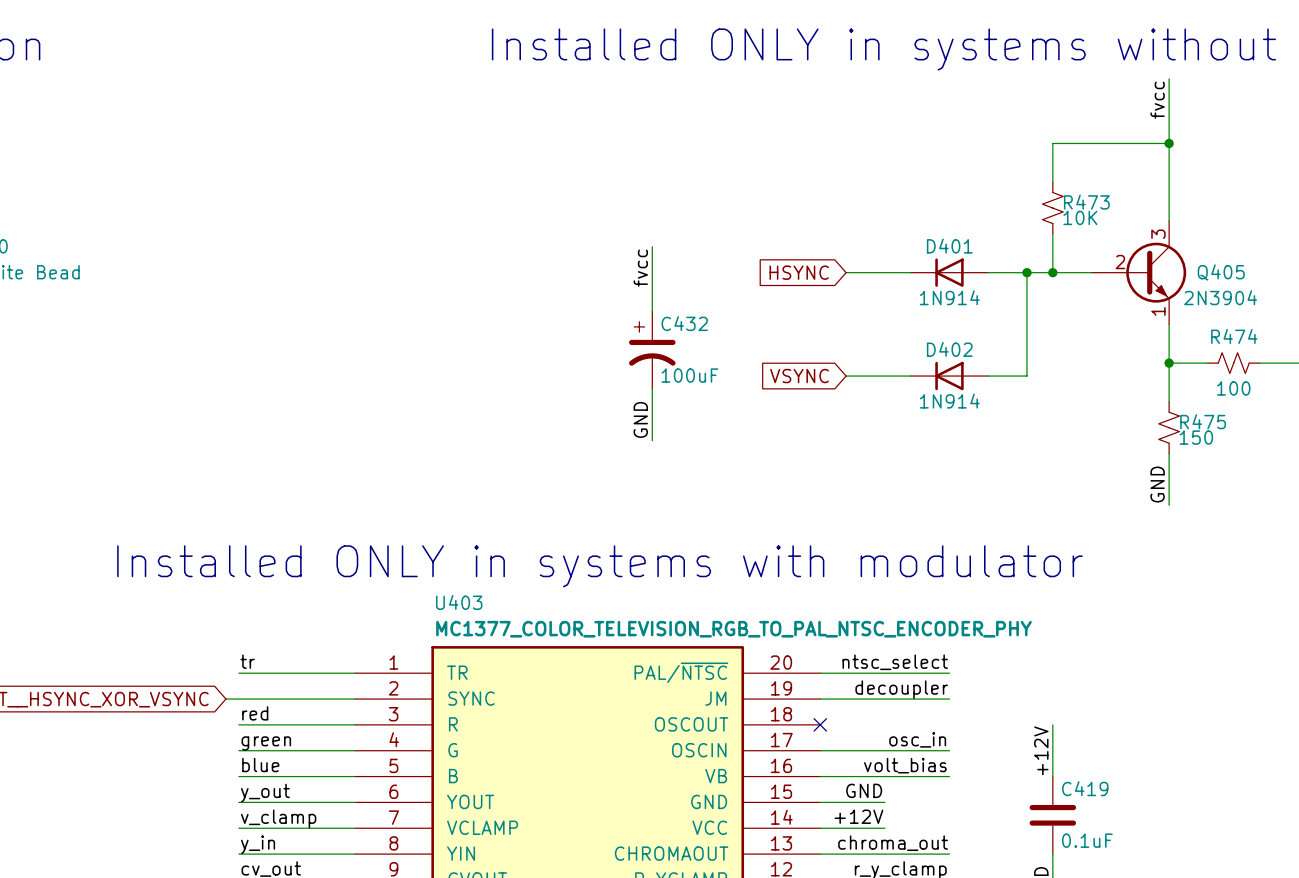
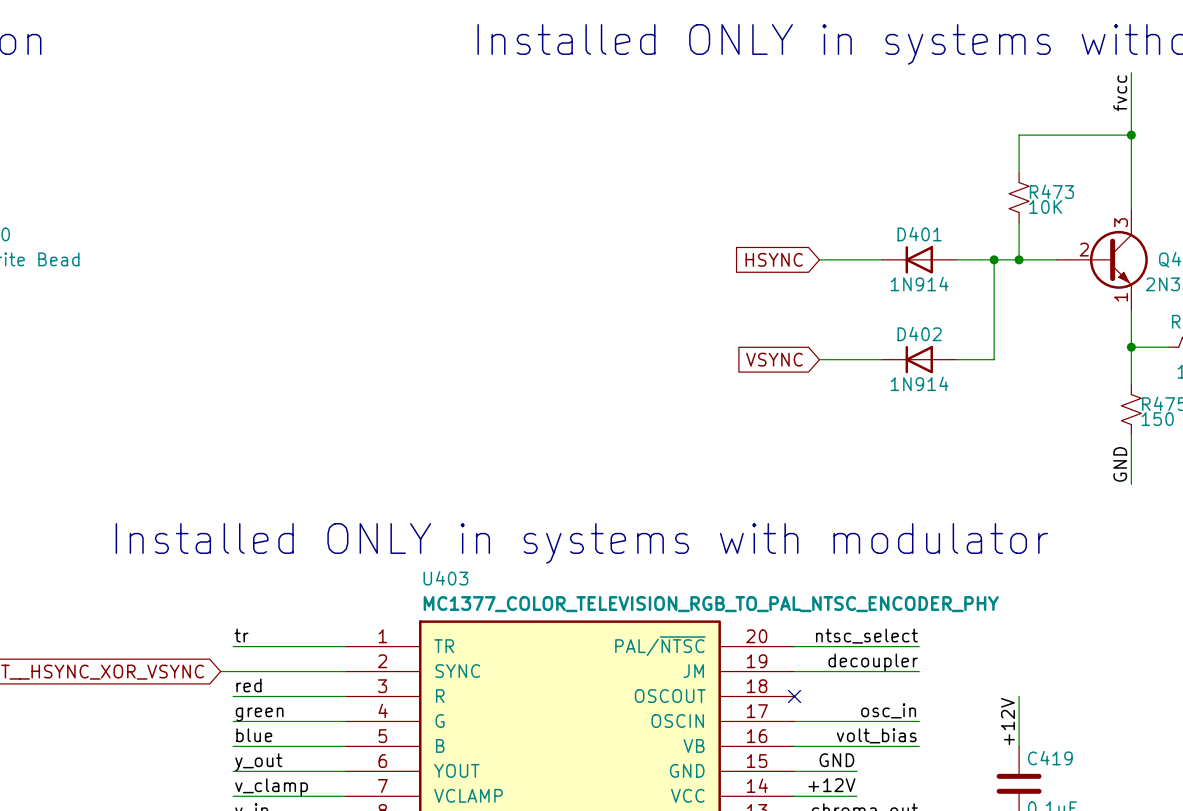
wire: (652, 246) (652, 311) -> none
label: fvcc (640, 268) -> none
C432: 100uF (652, 350) -> none
wire: (652, 388) (652, 440) -> none
label: GND (640, 419) -> none

